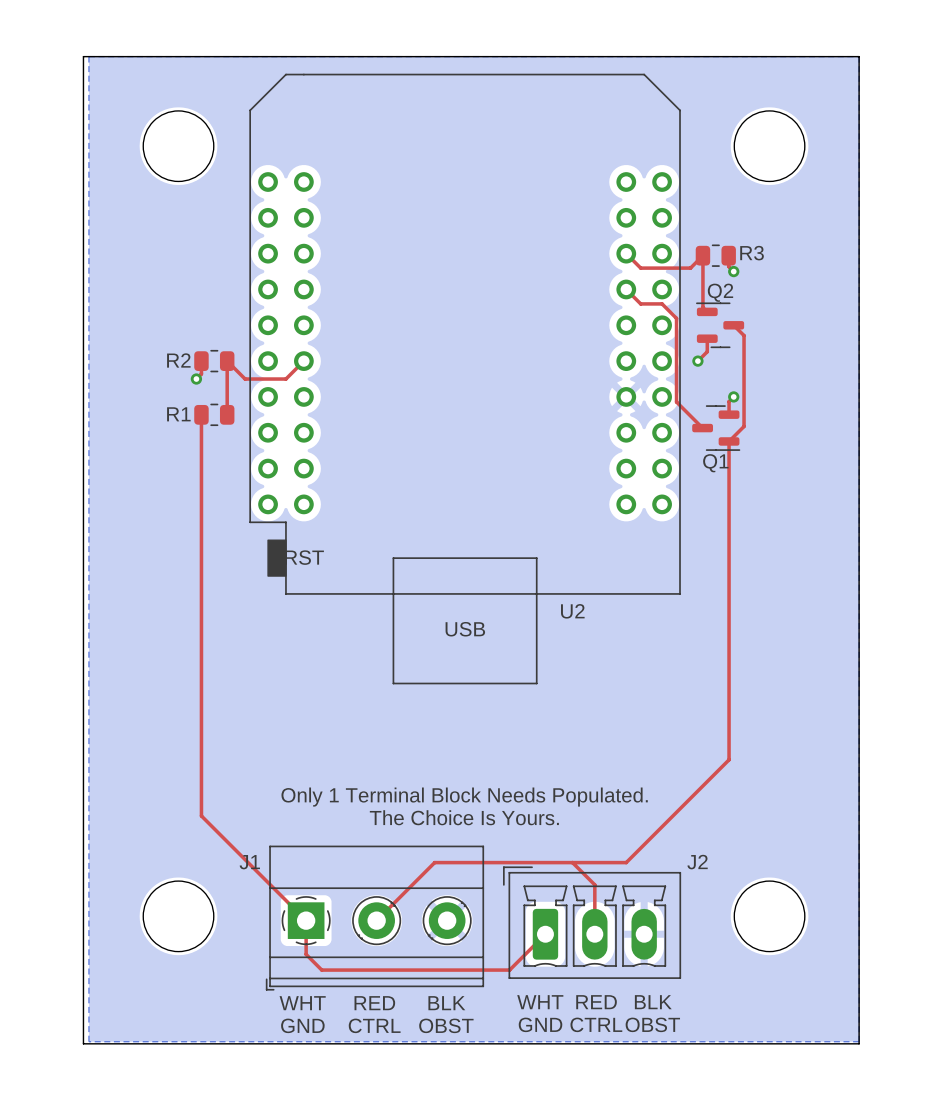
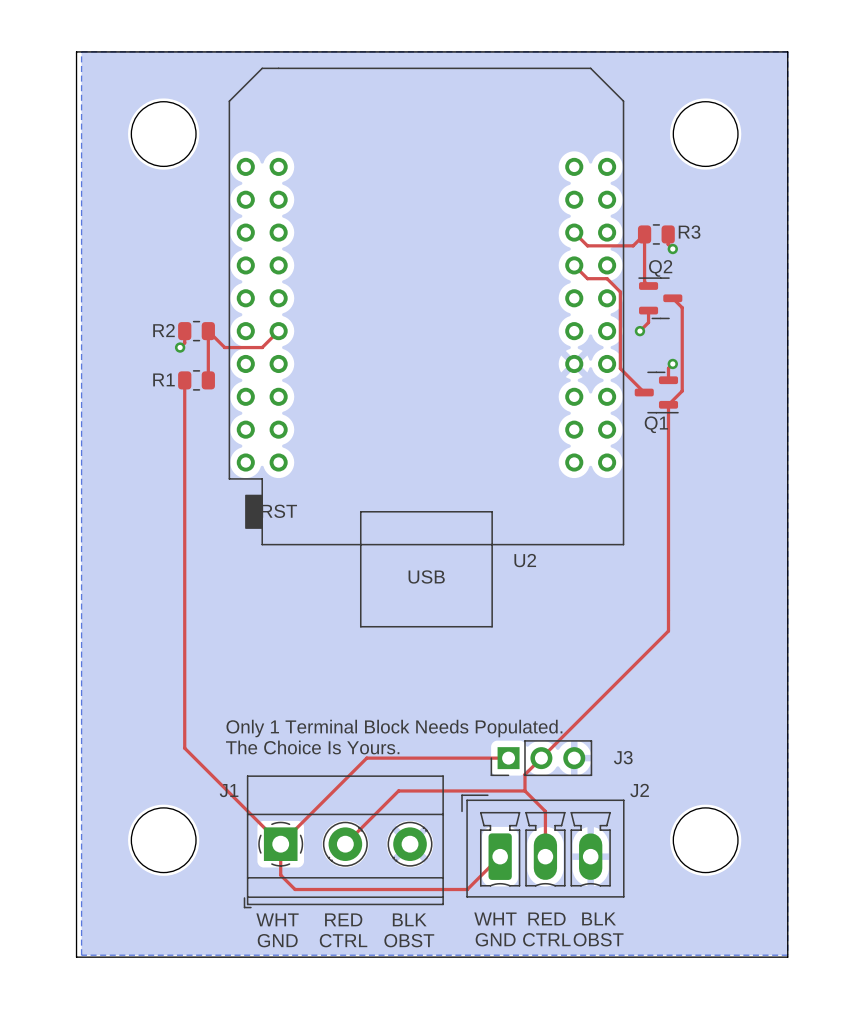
top track: (729, 688) (729, 759) (626, 862) (572, 862) -> (668, 631) (524, 774) (524, 790)
text position: Only 1 Terminal Block Needs Populated. (464, 797) -> Only 1 Terminal Block Needs Populated. (394, 728)
text position: The Choice Is Yours. (464, 817) -> The Choice Is Yours. (312, 747)
top track: none -> (508, 758) (366, 758) (280, 844)
J3: none -> (541, 758)

